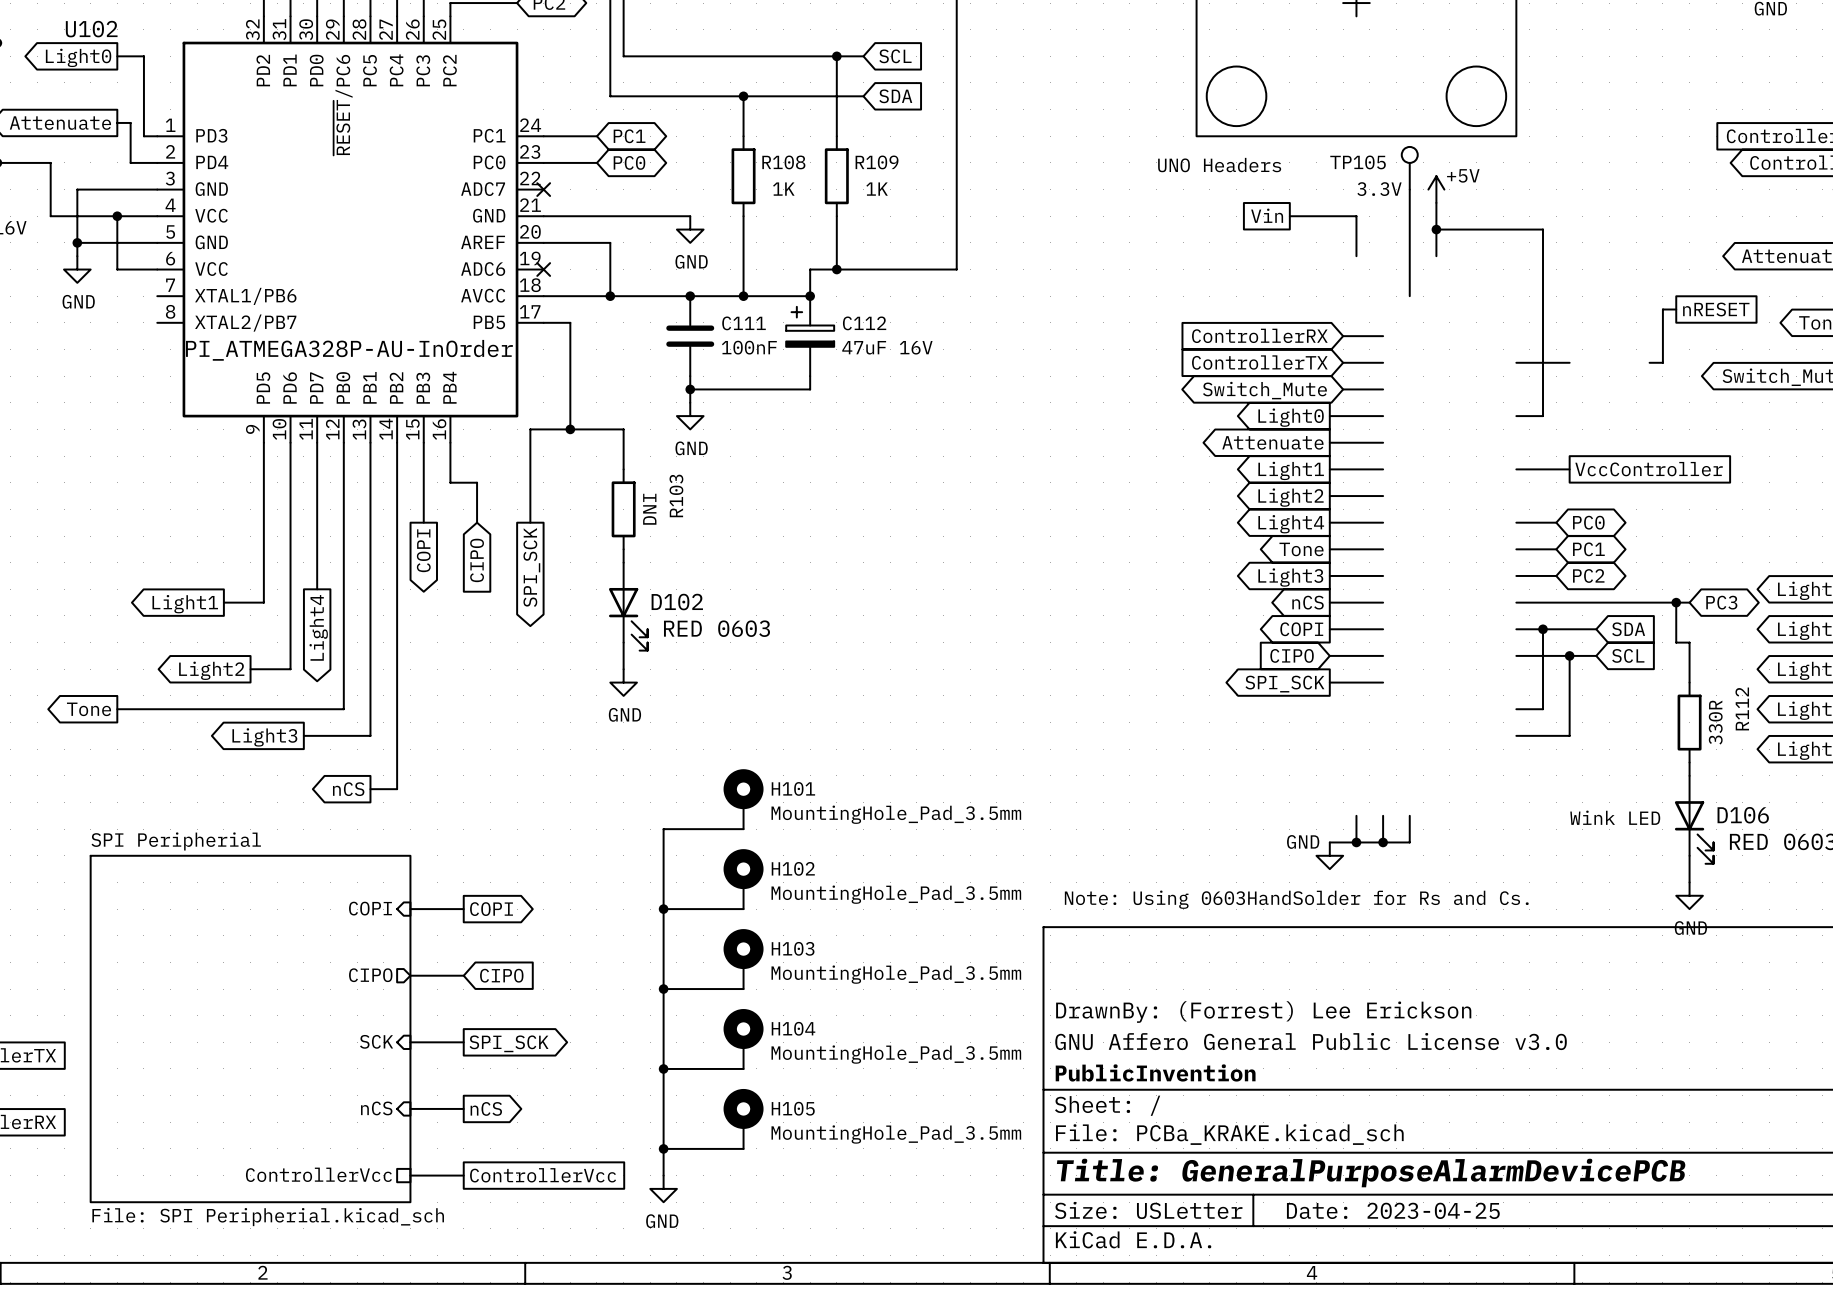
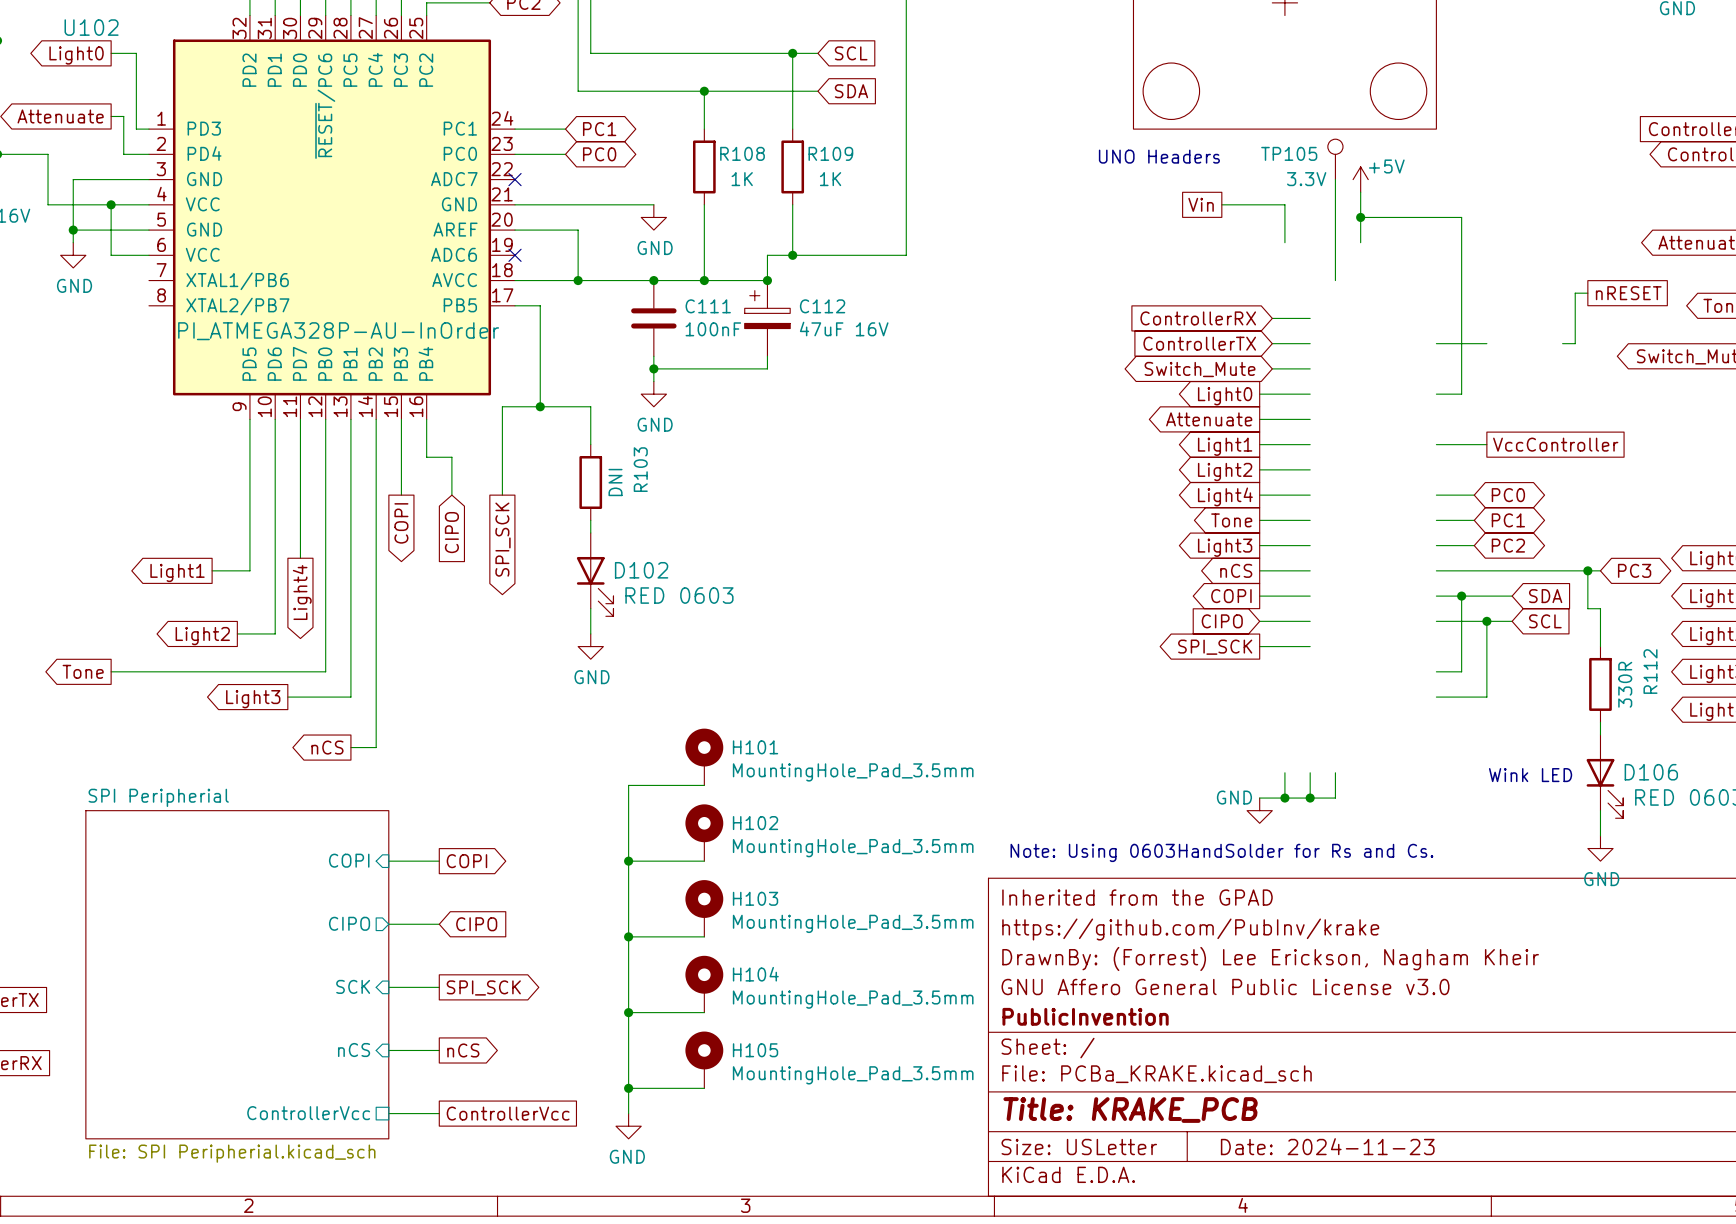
title block: none -> Inherited from the GPAD (1137, 897)
title block: none -> https://github.com/PubInv/krake (1190, 929)
title block: DrawnBy: (Forrest) Lee Erickson (1263, 1012) -> DrawnBy: (Forrest) Lee Erickson, Nagham Kheir (1270, 958)
title block: Title: GeneralPurposeAlarmDevicePCB (1371, 1173) -> Title: KRAKE_PCB (1130, 1110)
title block: Date: 2023-04-25 (1393, 1210) -> Date: 2024-11-23 (1327, 1146)

